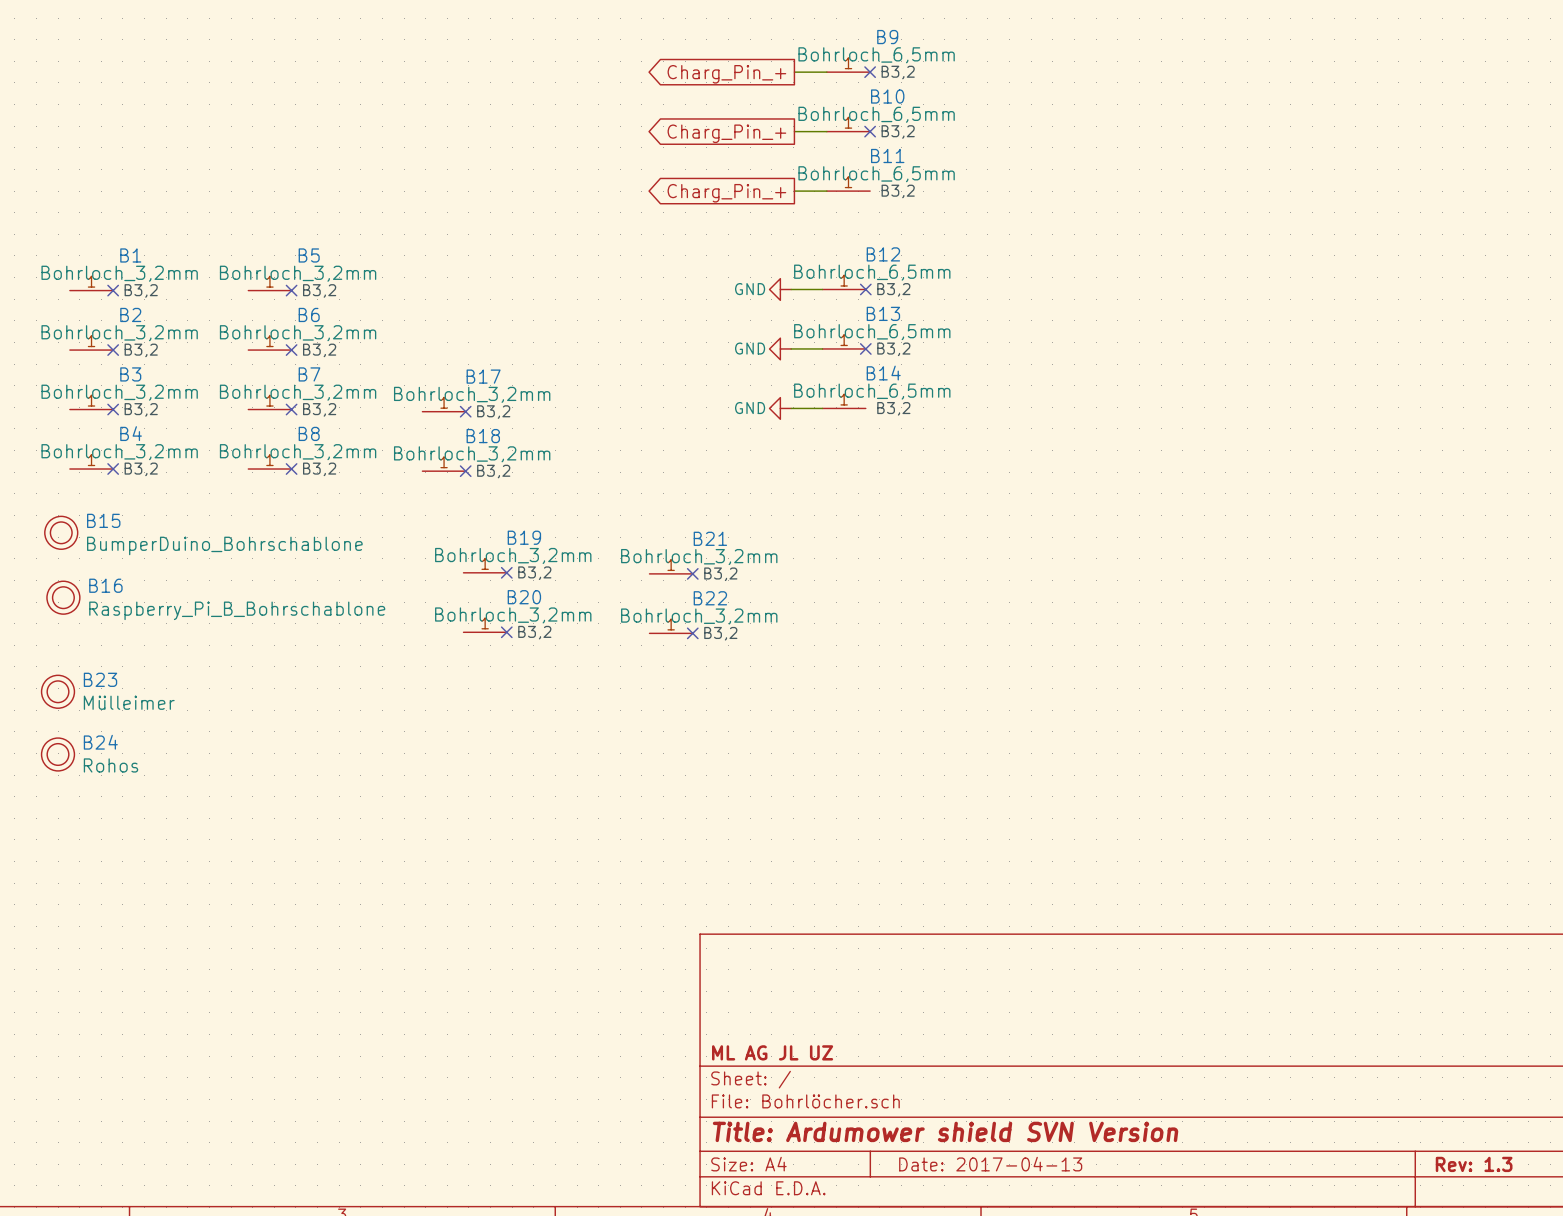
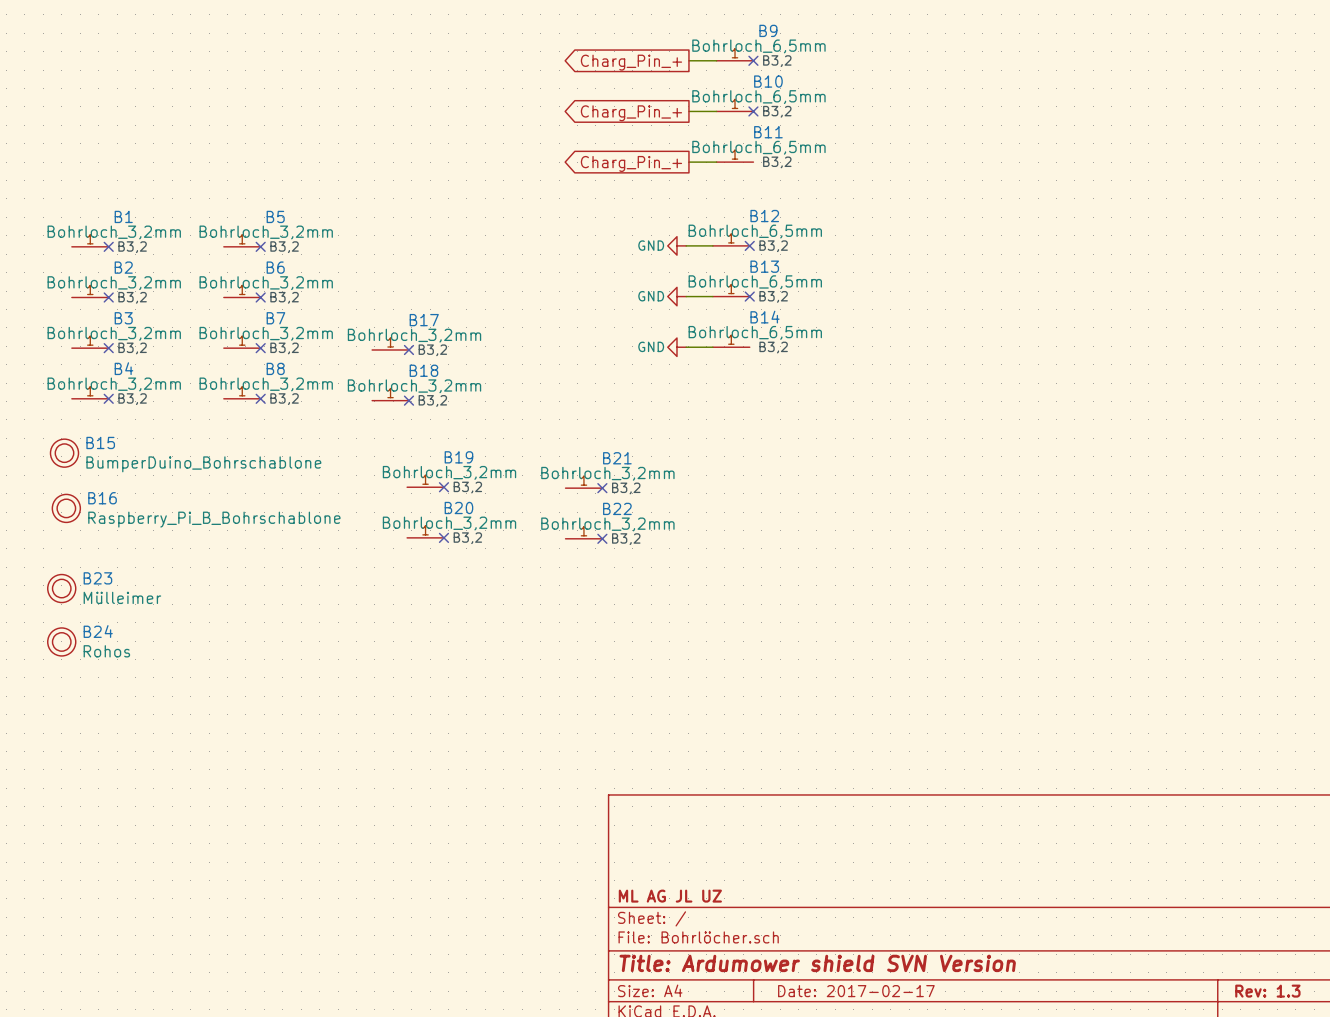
title block: Date: 2017-04-13 (990, 1164) -> Date: 2017-02-17 (856, 991)

